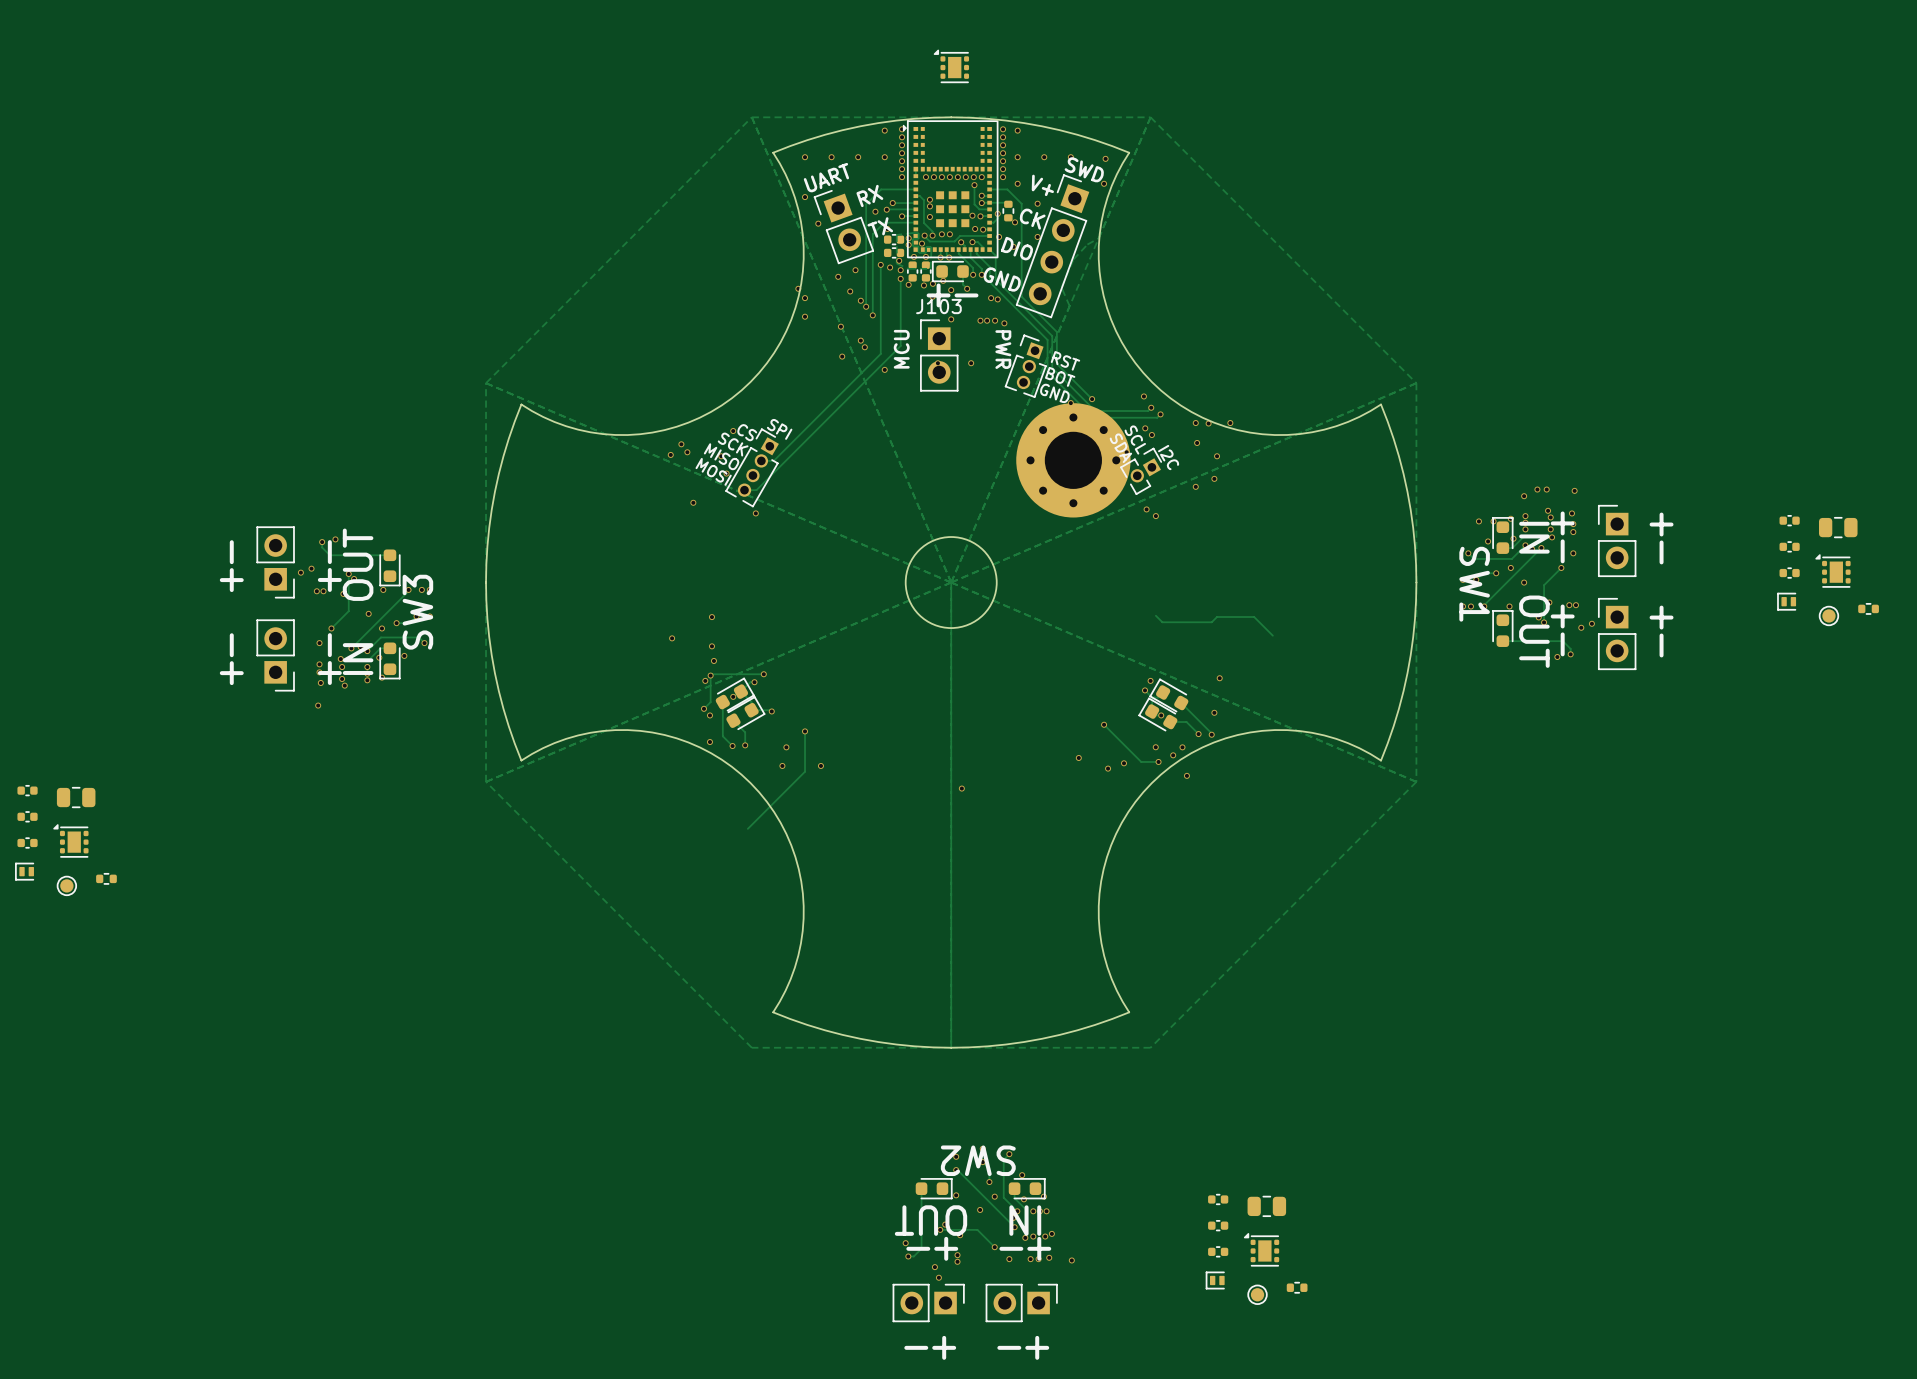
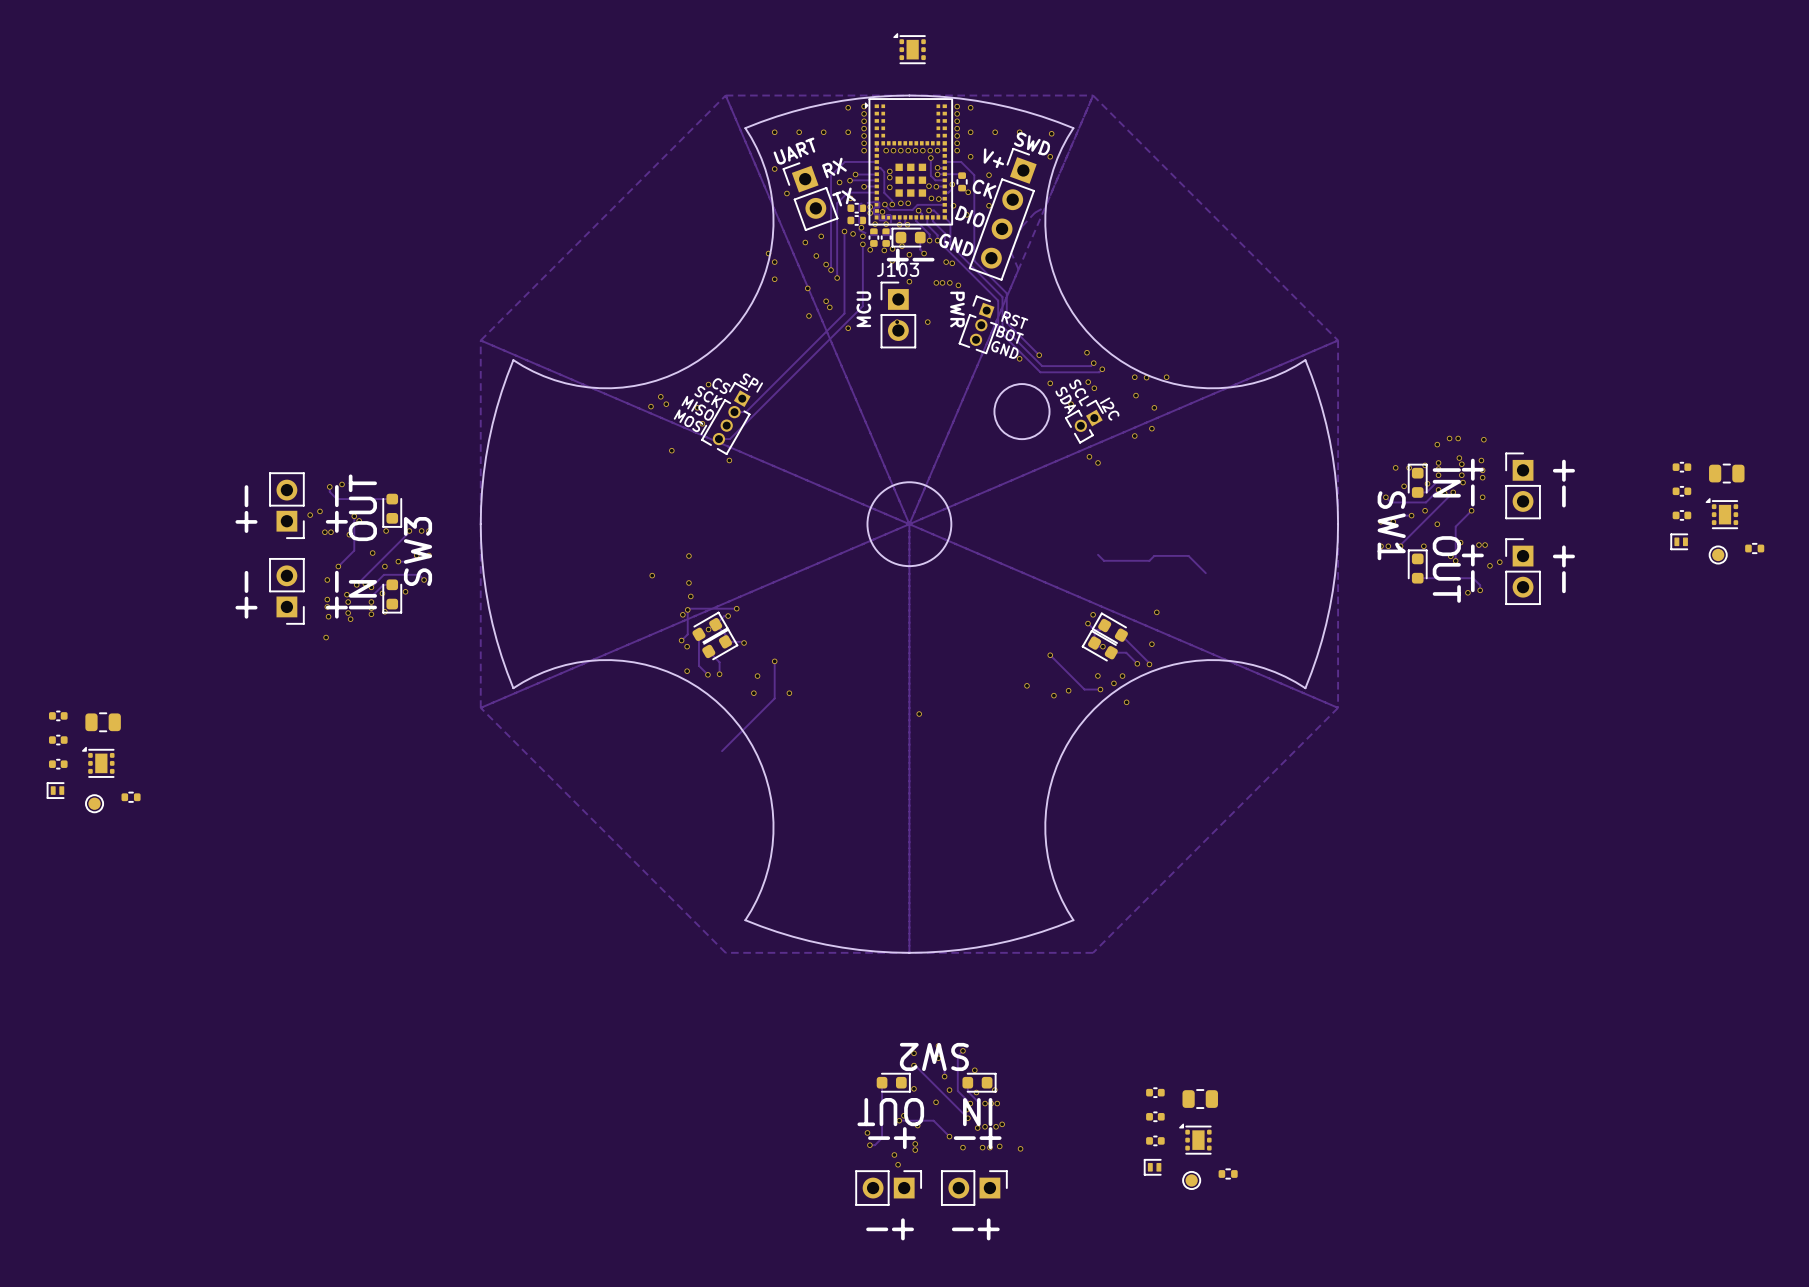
round board edge: none -> [994, 383, 1050, 440]
part: (1073, 460) -> none

